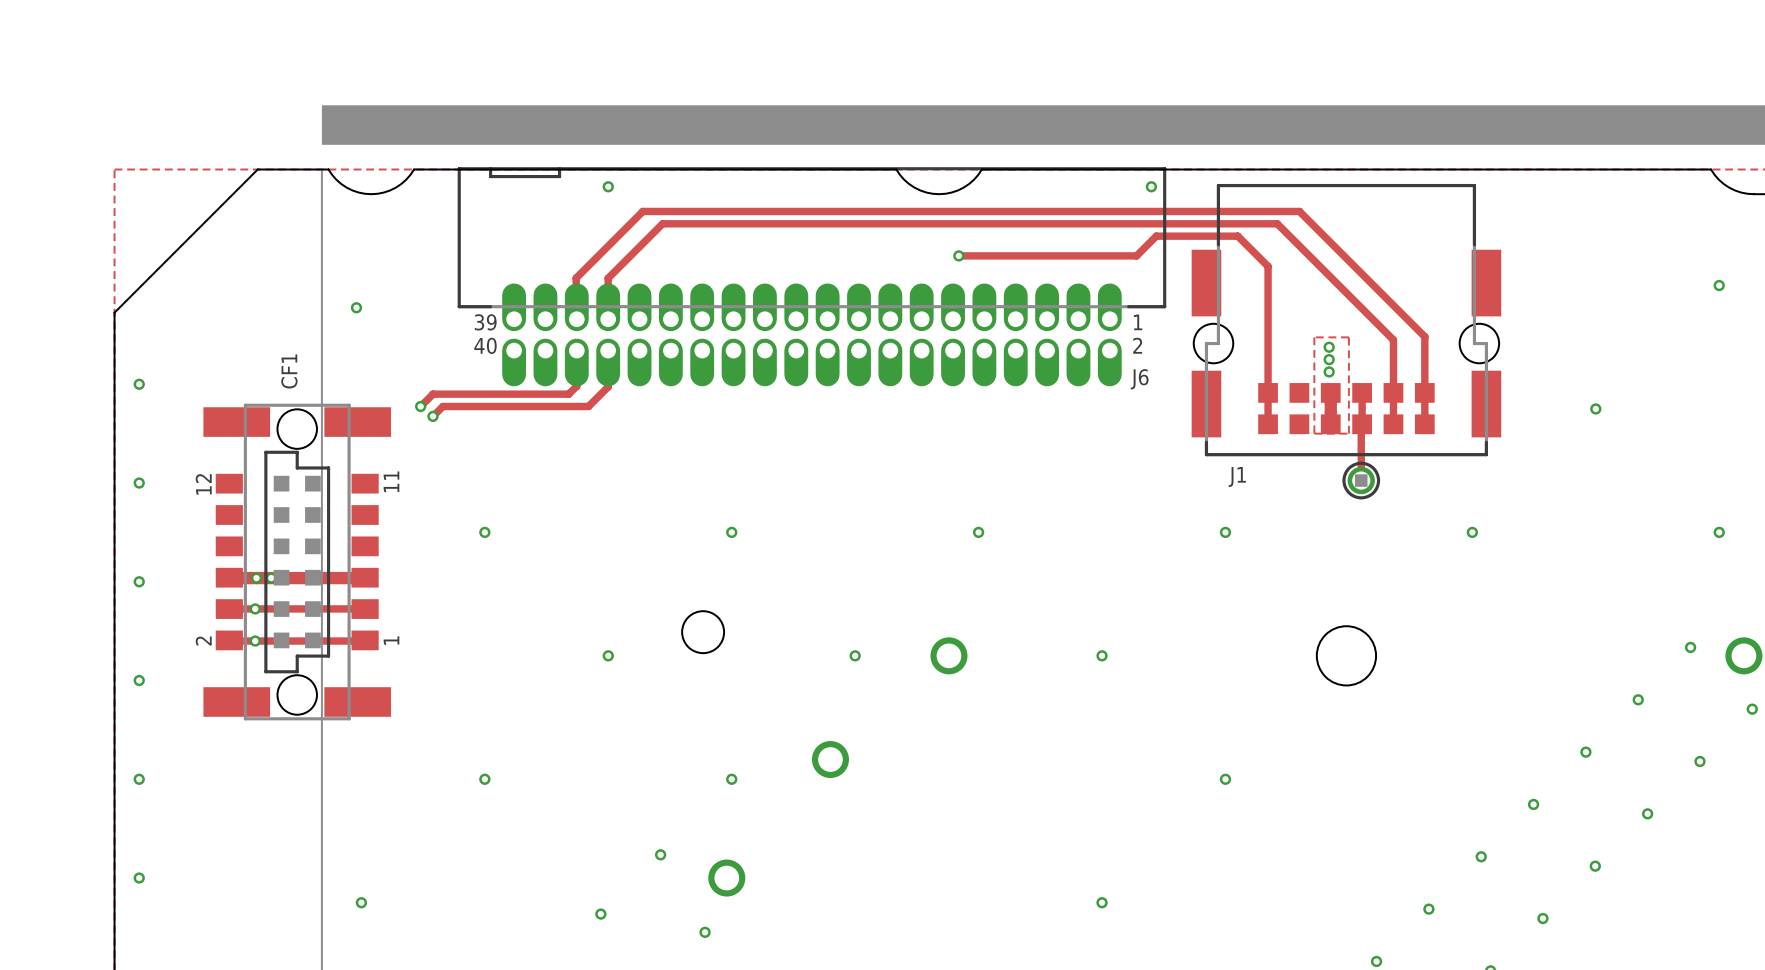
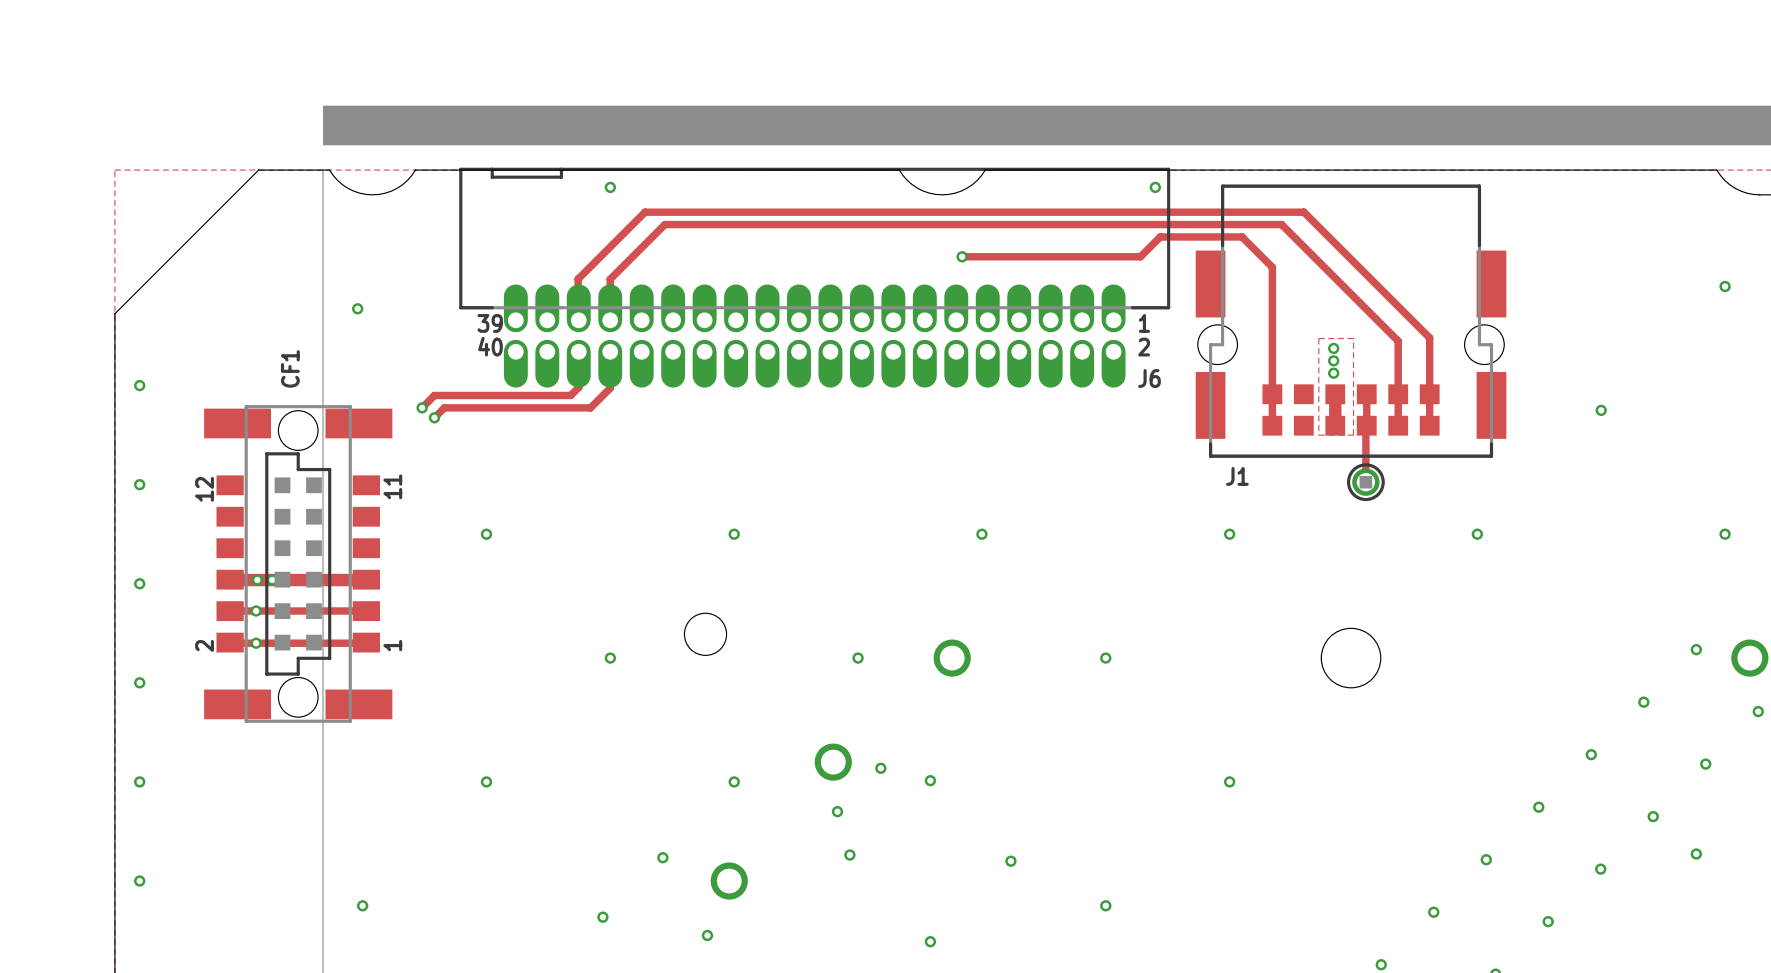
via: none -> (880, 768)
via: none -> (930, 780)
via: none -> (837, 811)
via: none -> (1696, 854)
via: none -> (849, 855)
via: none -> (1010, 861)
via: none -> (930, 941)

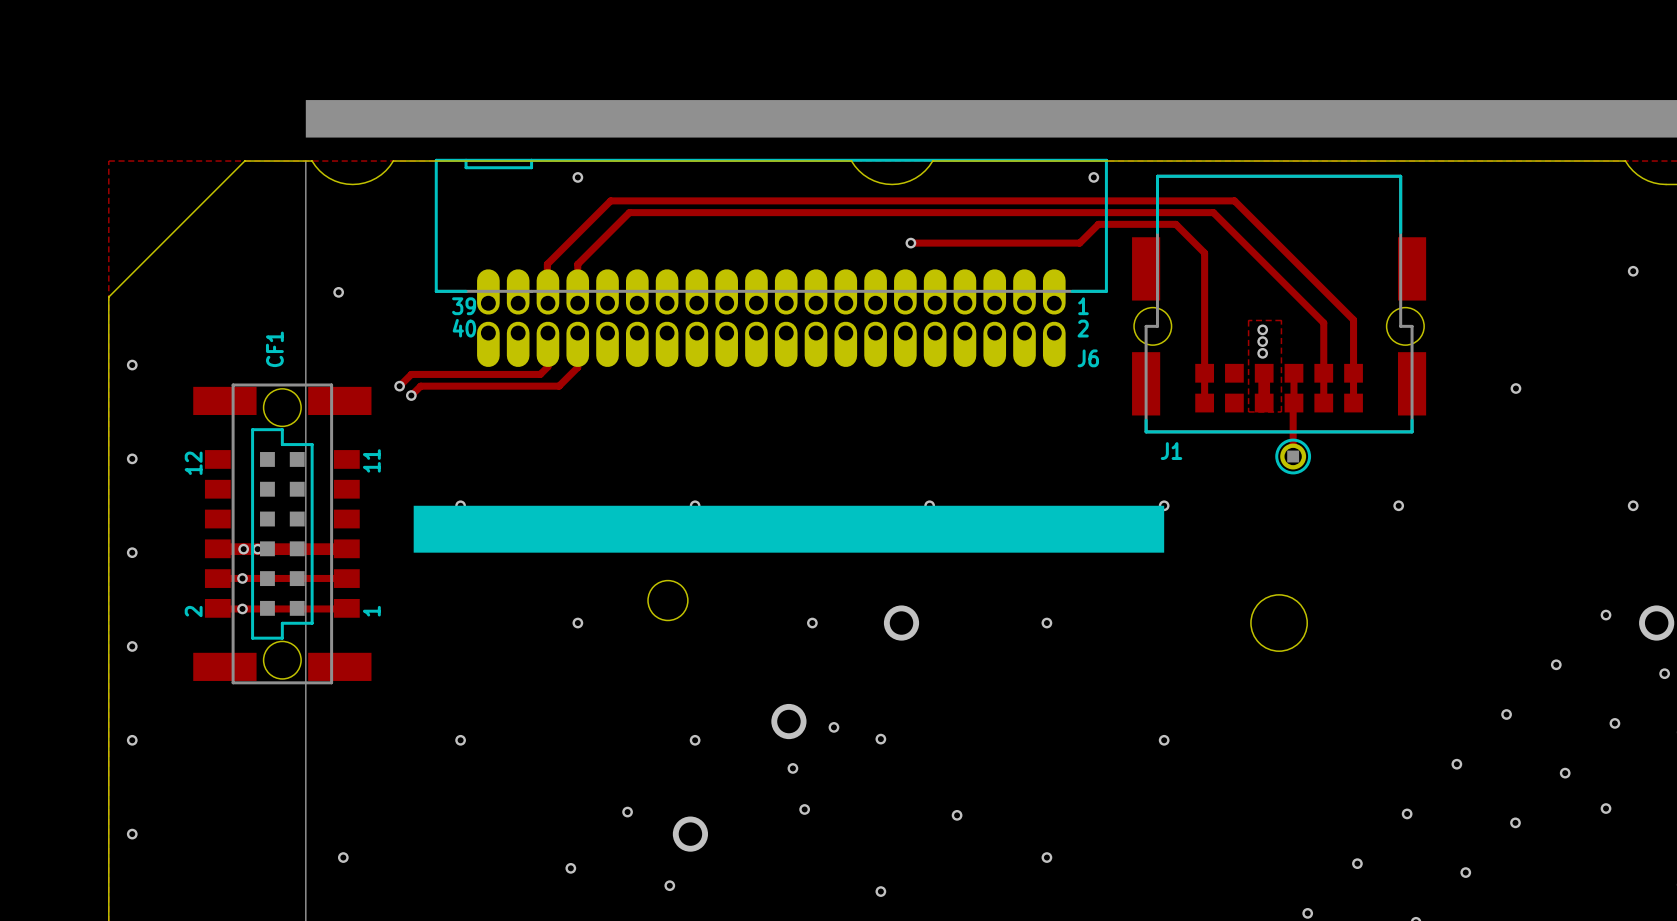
drawing: none -> [413, 505, 1165, 553]

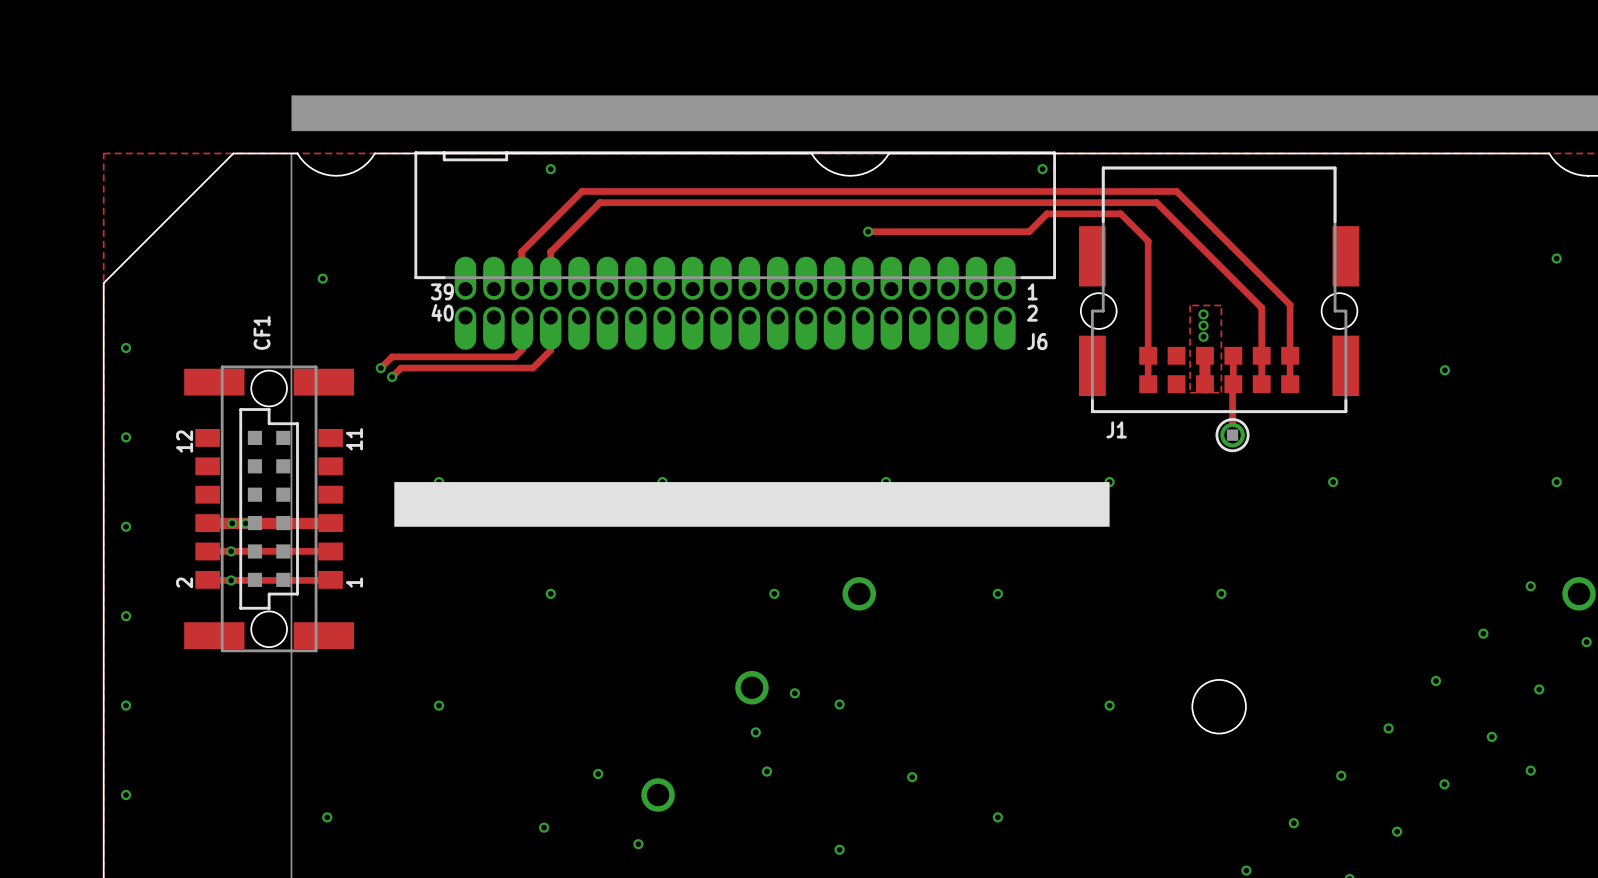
round board edge: [647, 580, 688, 621] -> none
round board edge position: (1279, 623) -> (1219, 706)
via: none -> (1221, 593)
via: (695, 740) -> none

